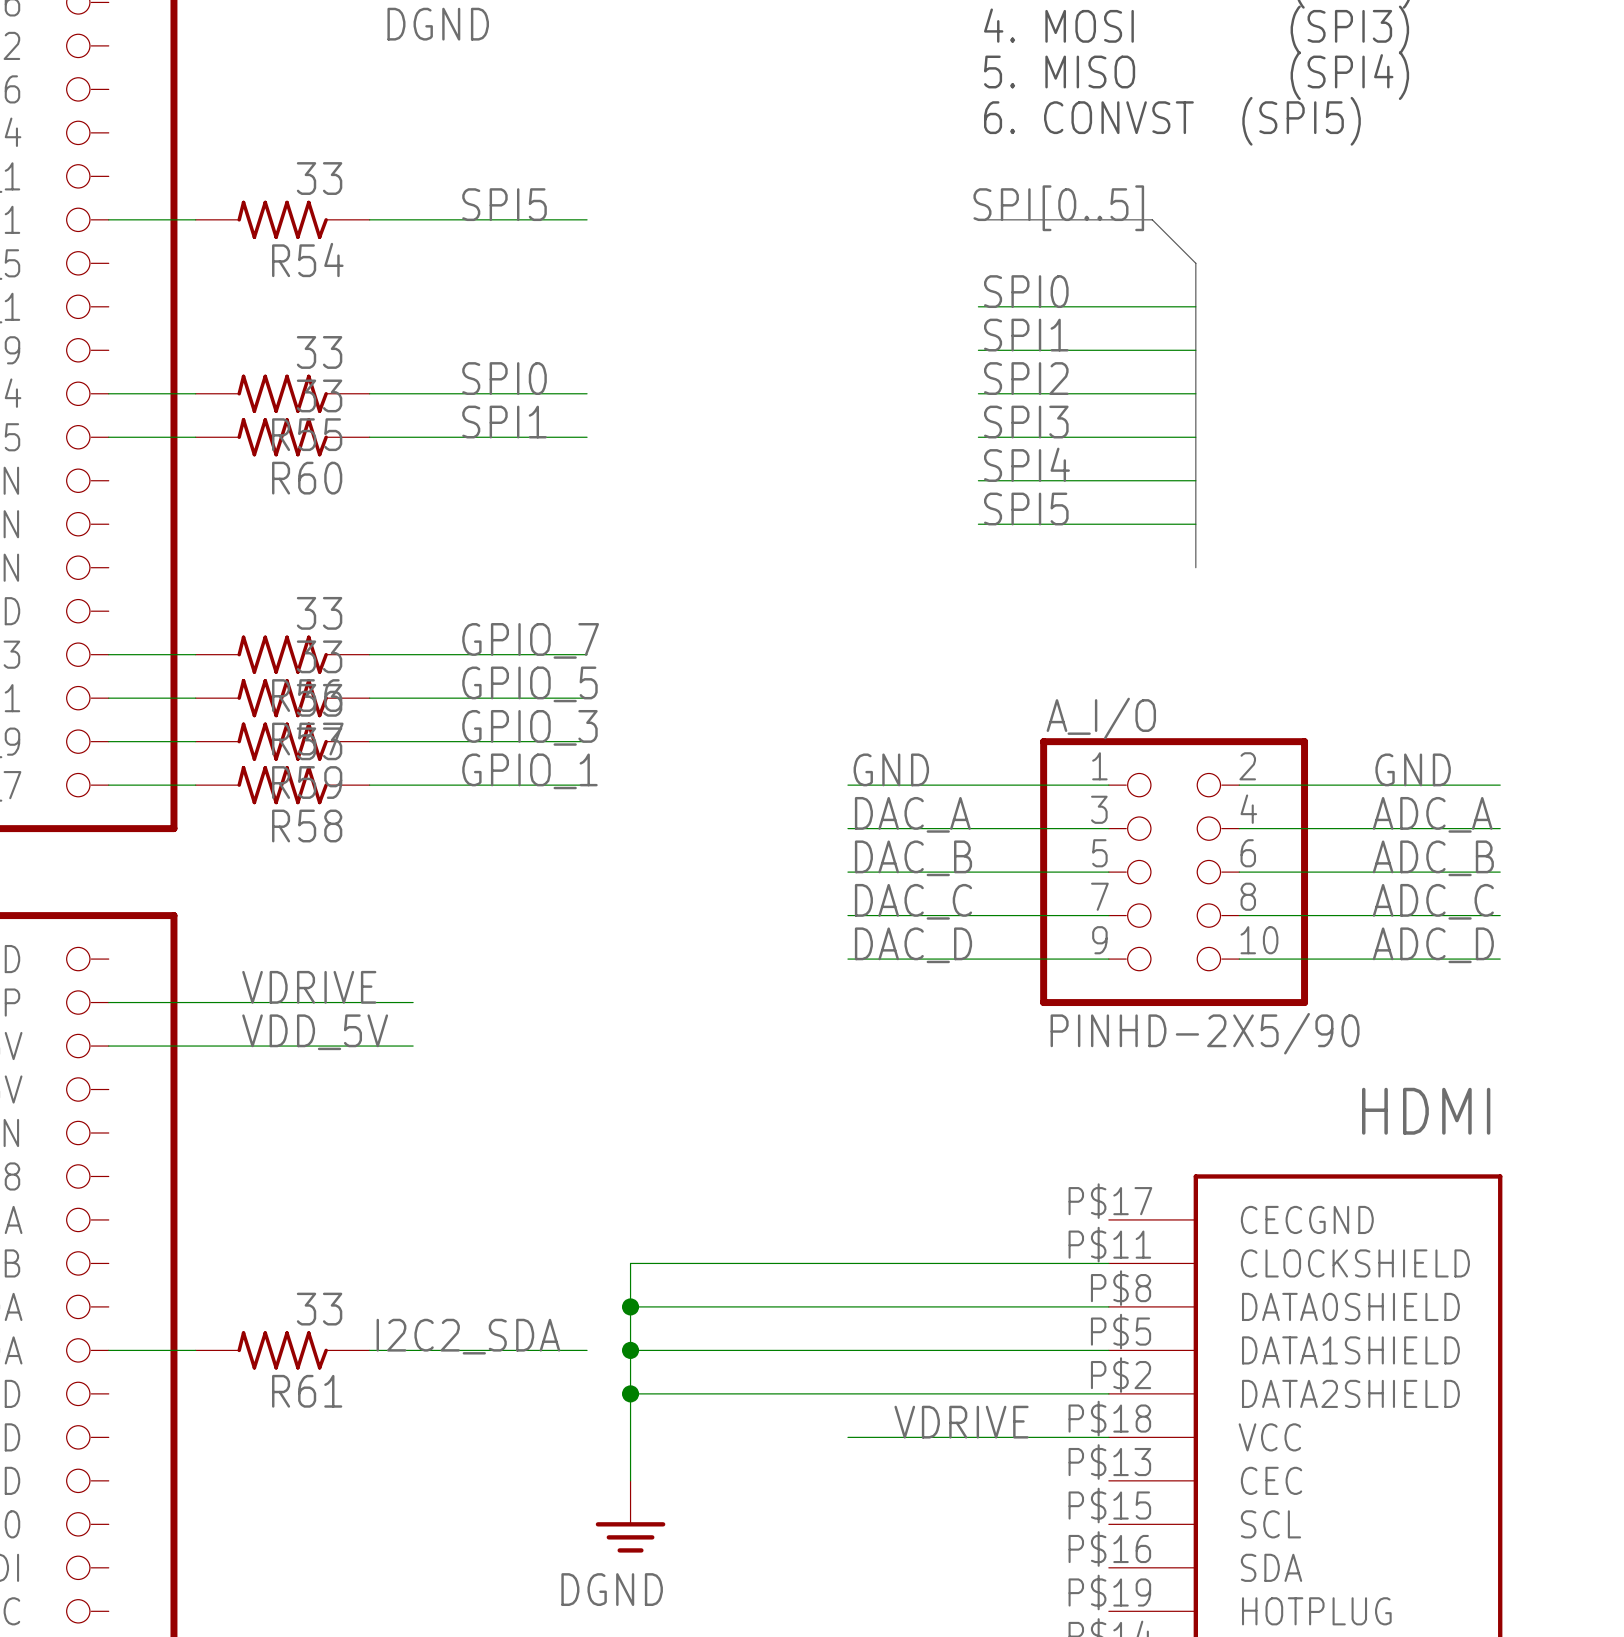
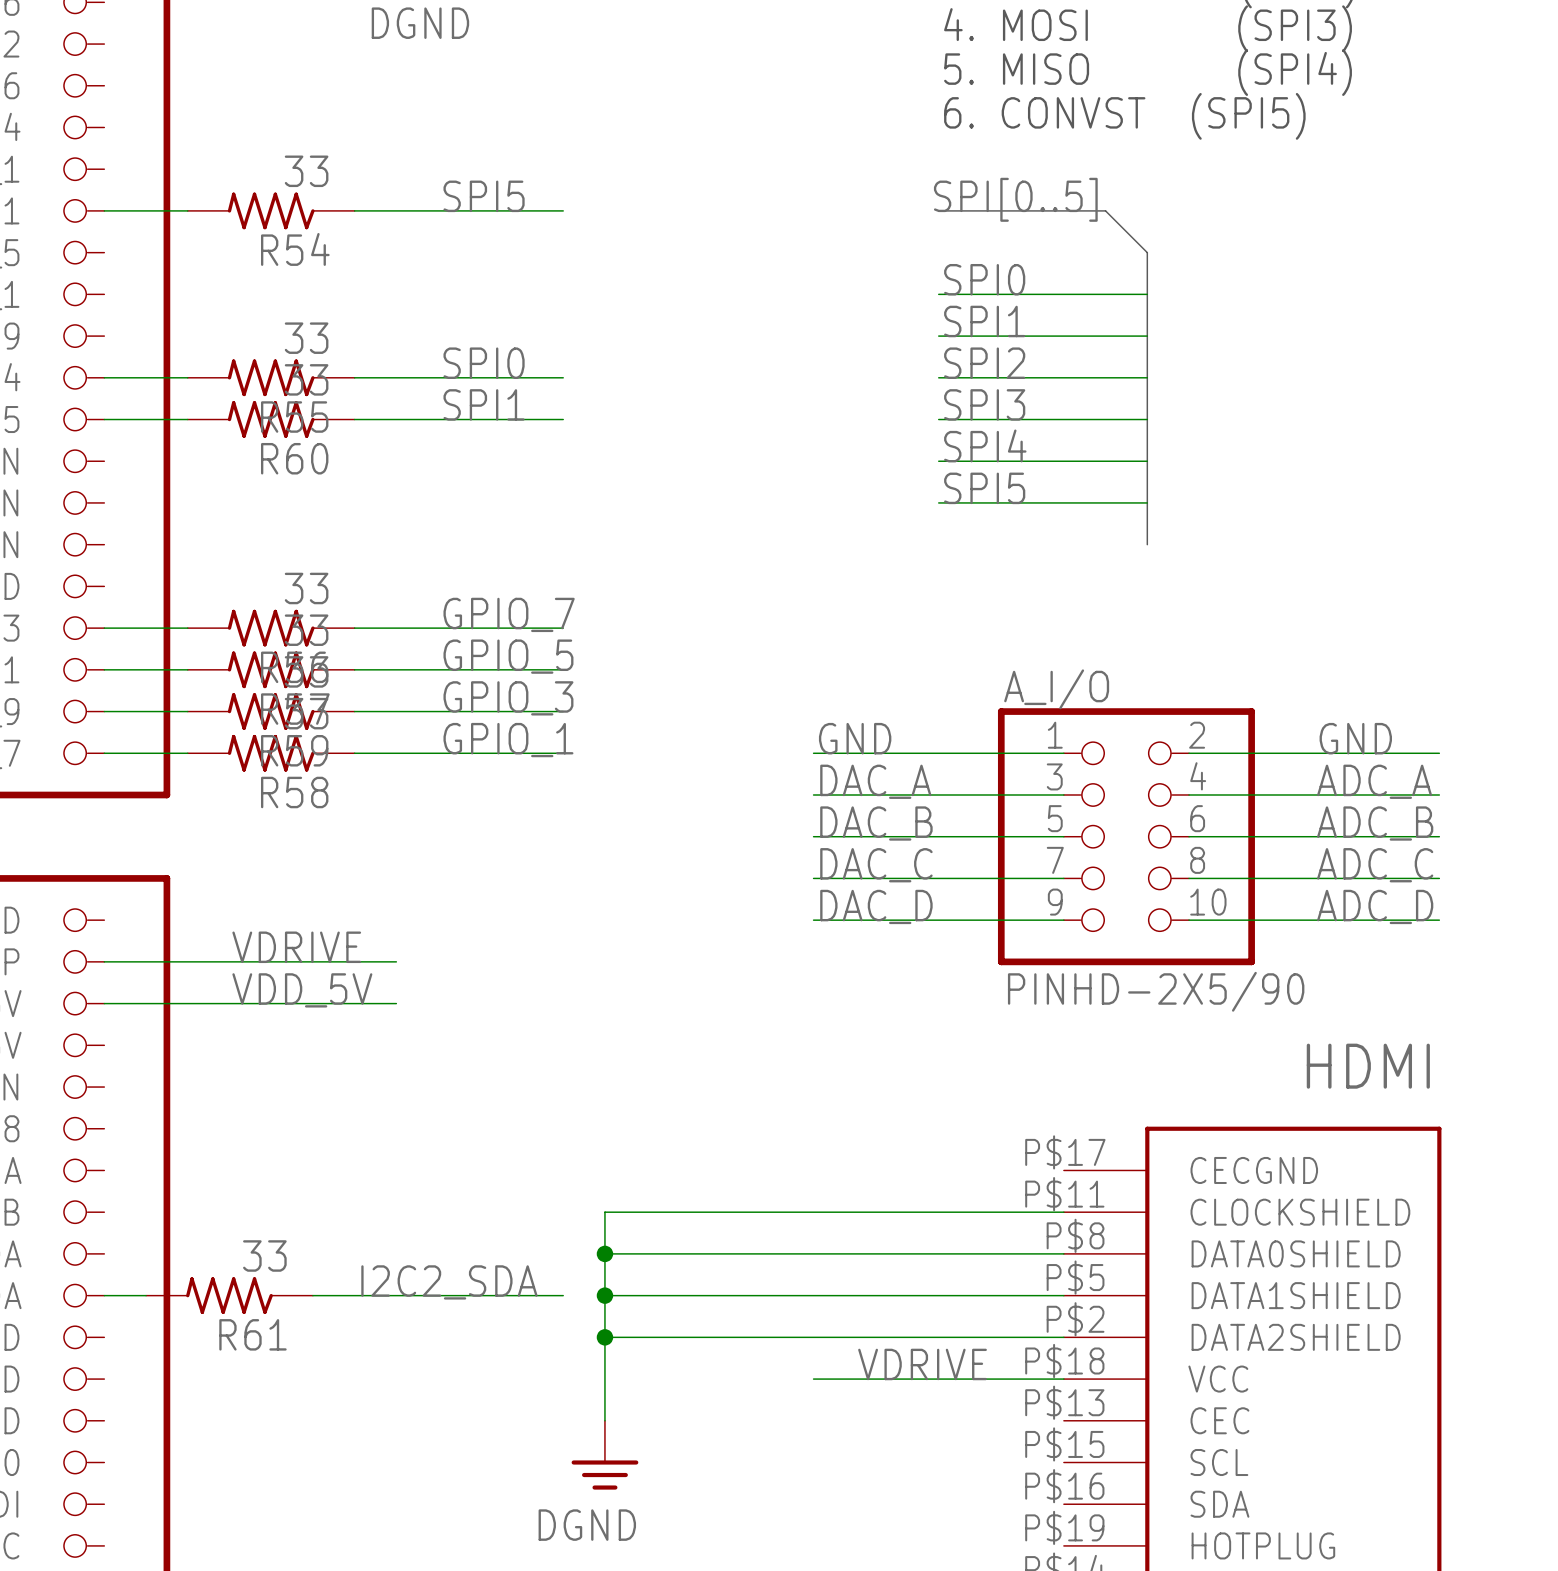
R61 position: (282, 1350) -> (229, 1295)

